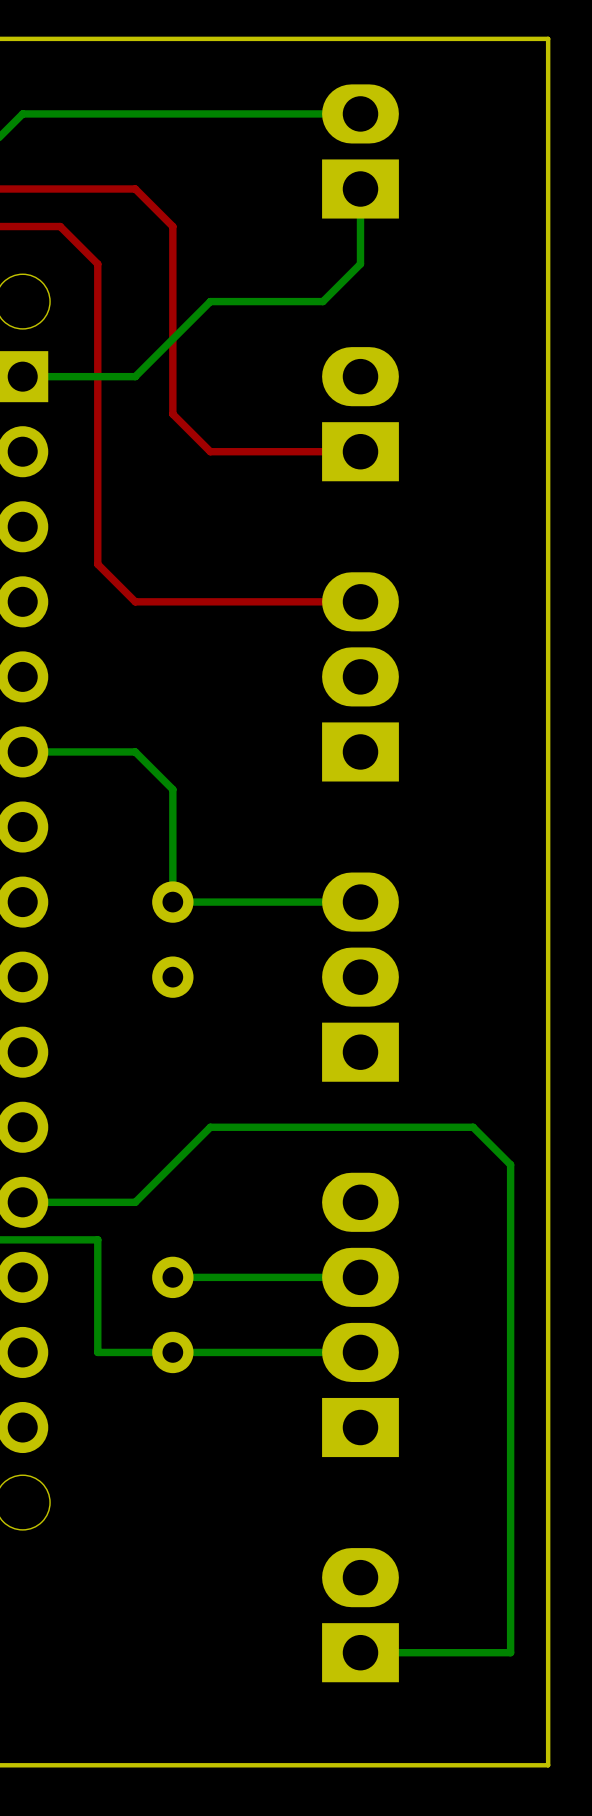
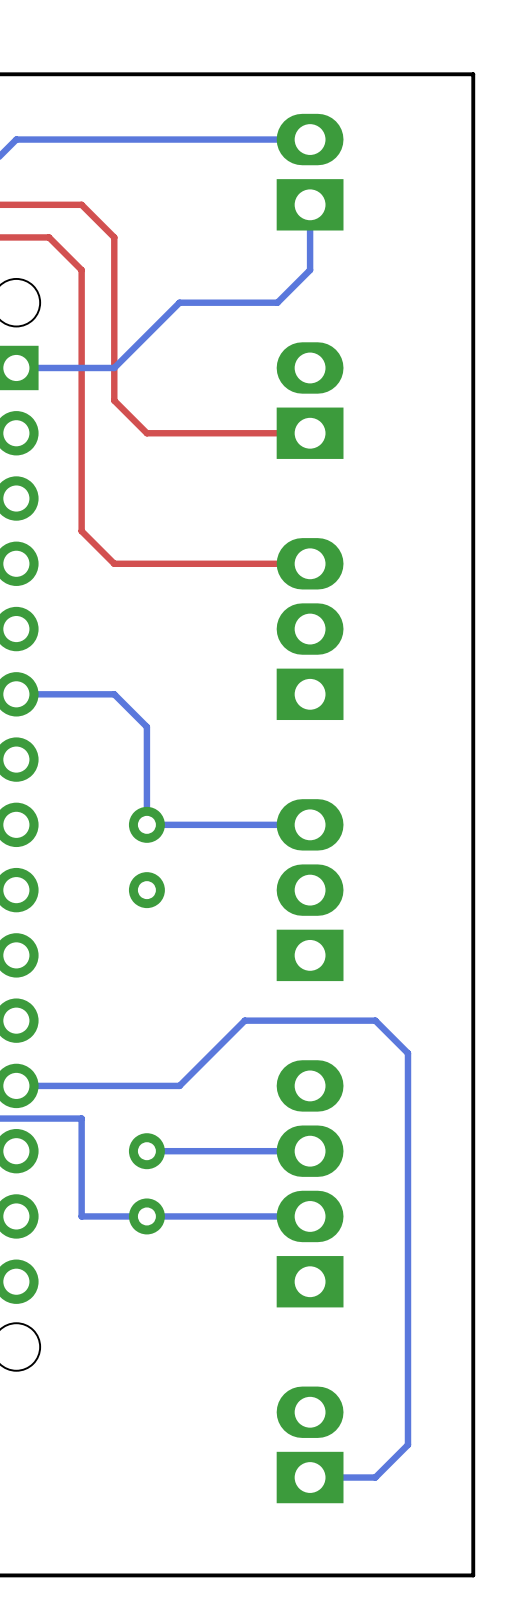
top track: (97, 189) (135, 189) (172, 226) (172, 414) (210, 451) -> (81, 204) (114, 237) (114, 400) (146, 433) (179, 433)
bottom track: (285, 1127) (210, 1127) (135, 1202) -> (244, 1020) (179, 1085) (114, 1085)
bottom track: (435, 1127) (473, 1127) (510, 1164) (510, 1652) (435, 1652) -> (375, 1020) (407, 1053) (407, 1444) (375, 1477)

